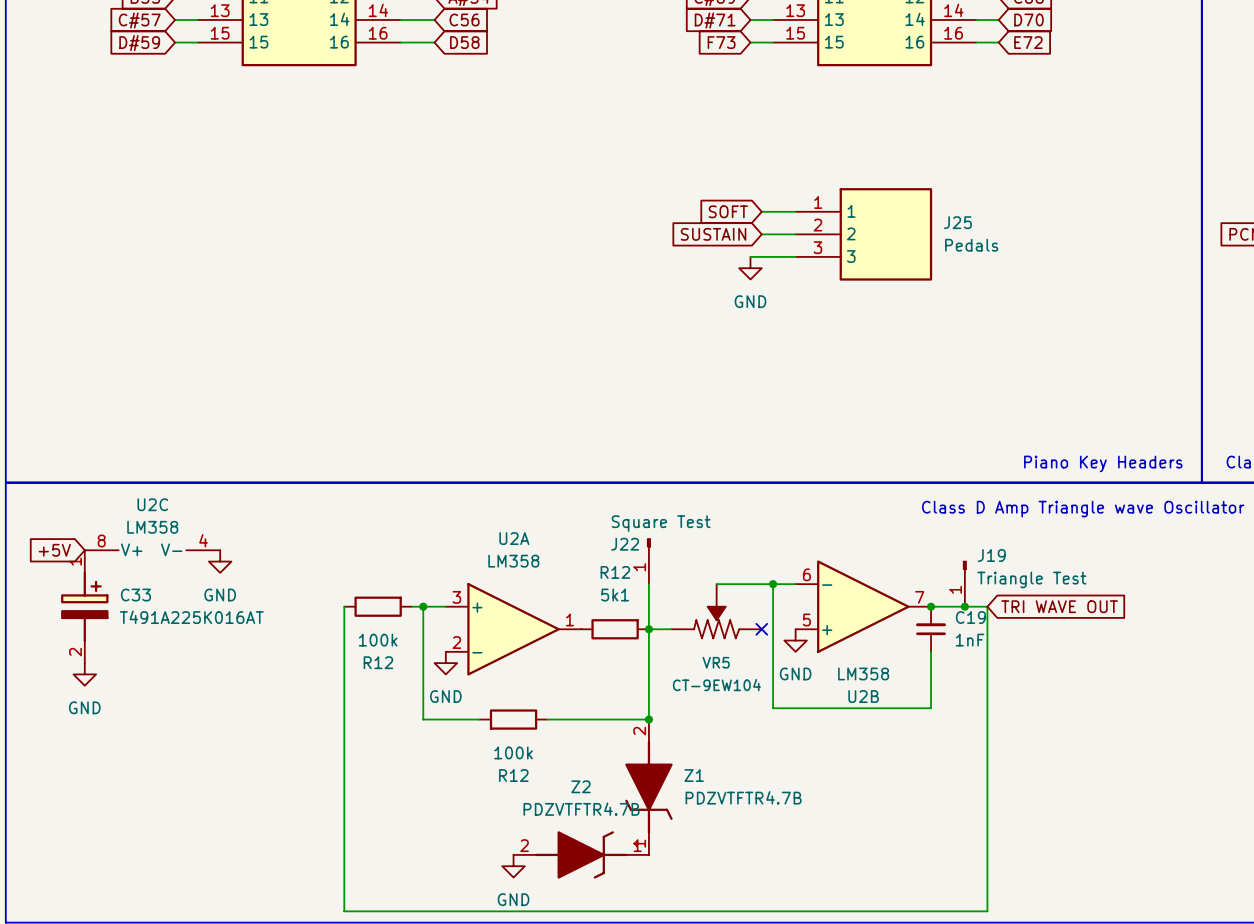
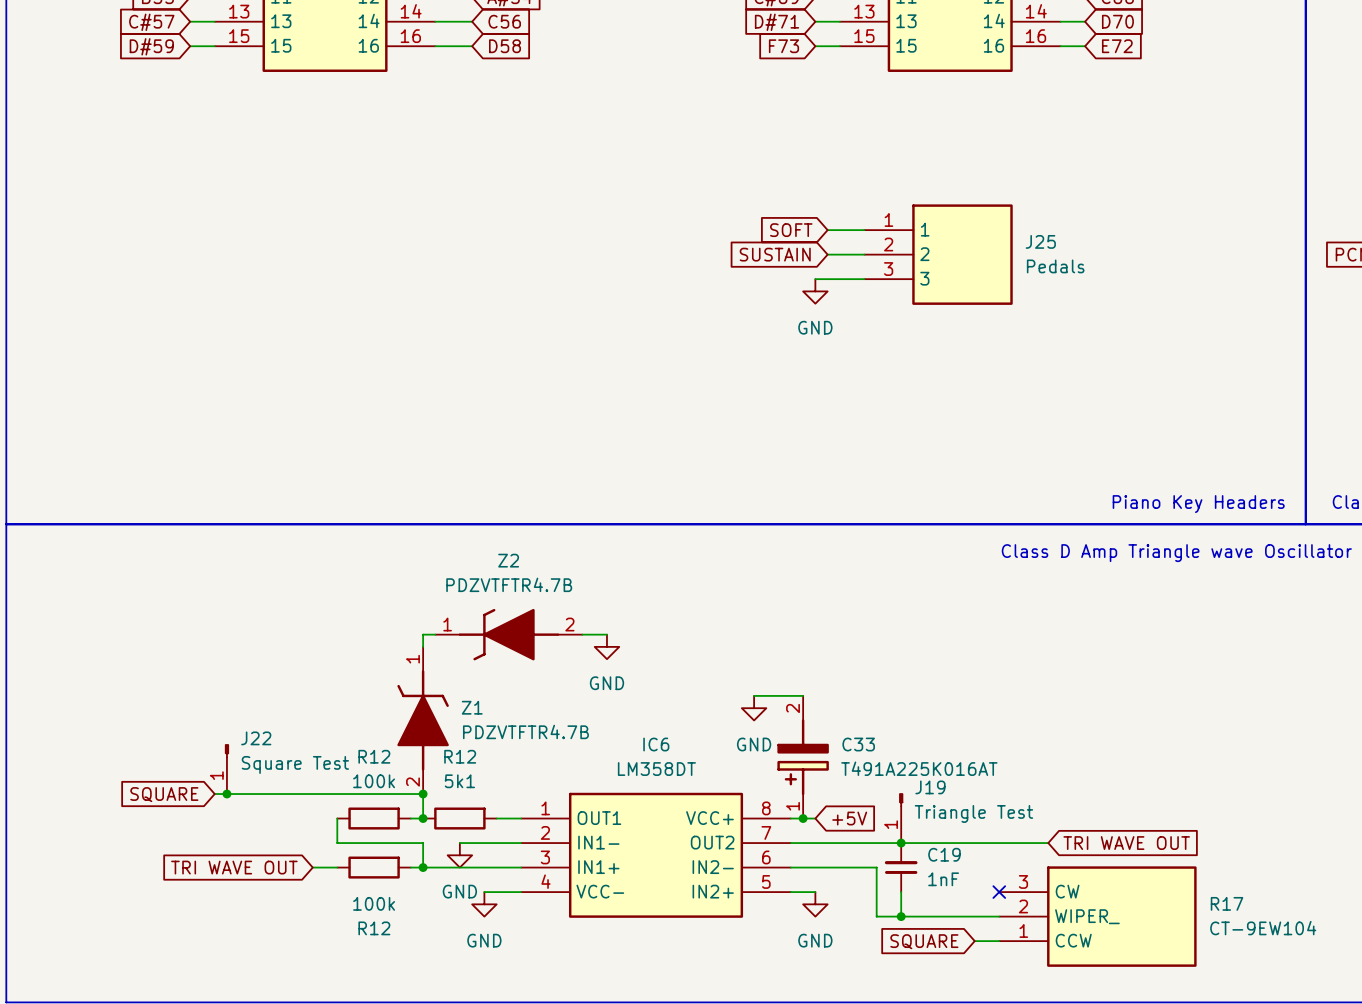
J22 value position: Square Test (661, 523) -> Square Test (295, 764)
J22 name position: J22 (625, 544) -> J22 (256, 738)
global label: +5V (54, 550) -> none
U2C: LM358 (152, 550) -> none
power symbol: GND (220, 561) -> none
J22 position: (648, 561) -> (226, 769)
J19 position: (964, 583) -> (901, 818)
wire: none -> (435, 634) (423, 634) (423, 646)
wire: (648, 584) (648, 719) (547, 719) -> none
wire: (716, 584) (795, 584) -> none
wire: (773, 584) (773, 708) (931, 708) (931, 651) -> none
junction: (773, 584) -> none
power symbol: none -> GND (606, 646)
C33 rotation: 0° (84, 606) -> 180° (803, 757)
C33 position: (84, 606) -> (803, 757)
wire: (344, 606) (344, 911) (987, 911) (987, 606) (931, 606) -> none
R12: 100k (378, 606) -> none
wire: (412, 606) (445, 606) -> (484, 892) (521, 892)
wire: (423, 606) (423, 719) (479, 719) -> none
junction: (423, 606) -> none
U2B: LM358 (863, 606) -> none
junction: (931, 606) -> none
junction: (964, 606) -> none
global label position: TRI WAVE OUT (1059, 606) -> TRI WAVE OUT (1126, 843)
VR5: CT-9EW104 (716, 611) -> none
U2A: LM358 (513, 629) -> none
R12: 5k1 (615, 629) -> none
wire: (648, 629) (671, 629) -> (582, 634) (606, 634)
junction: (648, 629) -> none
no-connect mark: (761, 629) -> none
C19 position: (931, 629) -> (901, 867)
wire: none -> (754, 695) (803, 695)
power symbol: GND (795, 640) -> none
power symbol: none -> GND (754, 708)
power symbol: GND (445, 663) -> none
power symbol: GND (84, 674) -> none
R12: 100k (513, 719) -> none
junction: (648, 719) -> none
wire: none -> (214, 794) (423, 794) (423, 818) (410, 818)
junction: none -> (226, 794)
junction: none -> (423, 794)
global label: none -> SQUARE (164, 794)
wire: none -> (337, 818) (337, 843) (423, 843) (423, 867)
R12: none -> 100k (374, 818)
junction: none -> (423, 818)
R12: none -> 5k1 (459, 818)
wire: none -> (496, 818) (521, 818)
wire: none -> (790, 818) (815, 818)
junction: none -> (803, 818)
global label: none -> +5V (849, 818)
wire: none -> (459, 843) (521, 843)
wire: none -> (790, 843) (1048, 843)
junction: none -> (901, 843)
power symbol: none -> GND (459, 855)
IC6: none -> LM358DT (656, 855)
Z1 rotation: 0° (648, 787) -> 180° (423, 720)
Z1 position: (648, 787) -> (423, 720)
global label: none -> TRI WAVE OUT (234, 867)
wire: none -> (312, 867) (337, 867)
R12: none -> 100k (374, 867)
wire: none -> (410, 867) (521, 867)
junction: none -> (423, 867)
wire: none -> (790, 867) (876, 867) (876, 916) (999, 916)
wire: none -> (790, 892) (815, 892)
wire: none -> (901, 892) (901, 916)
no-connect mark: none -> (999, 892)
power symbol: none -> GND (484, 904)
power symbol: none -> GND (815, 904)
junction: none -> (901, 916)
R17: none -> CT-9EW104 (1097, 916)
Z2 rotation: 0° (581, 854) -> 180° (508, 634)
Z2 position: (581, 854) -> (508, 634)
power symbol: GND (513, 866) -> none
global label: none -> SQUARE (924, 941)
wire: none -> (974, 941) (999, 941)

